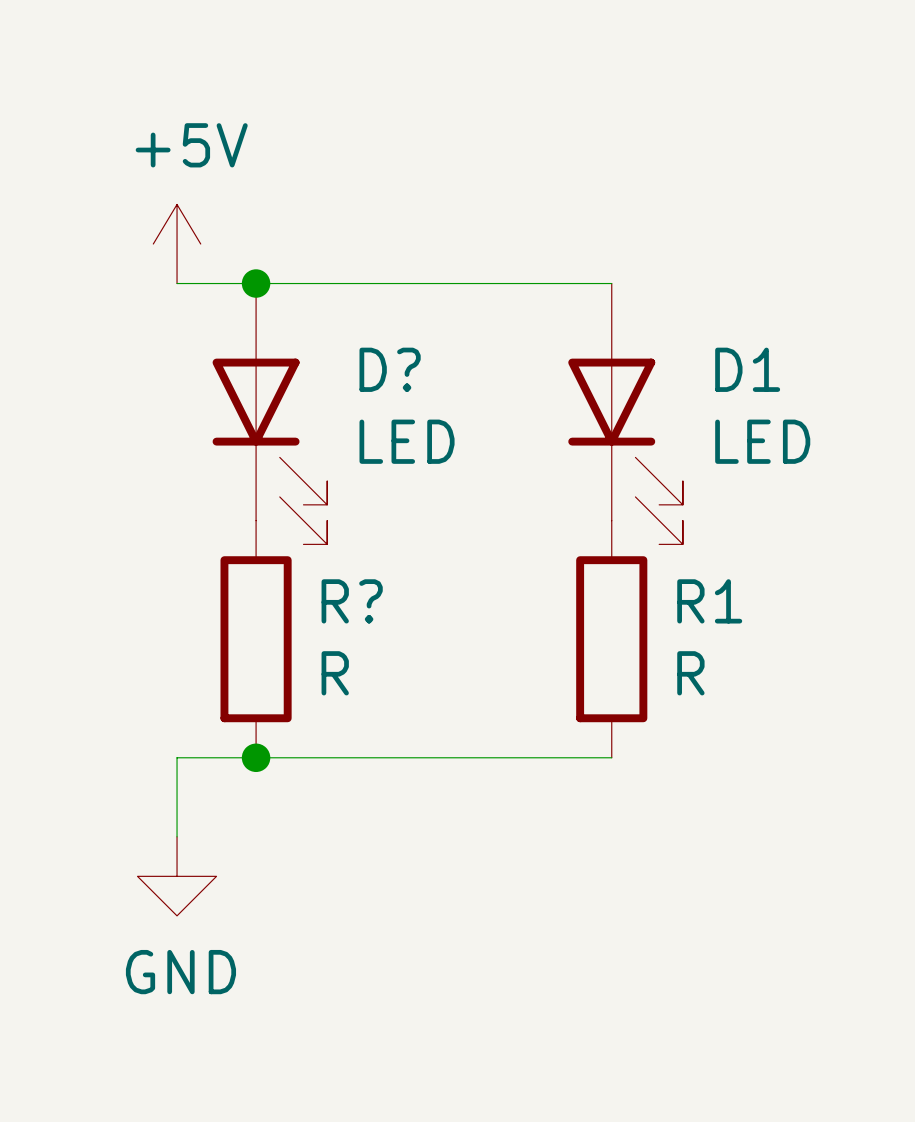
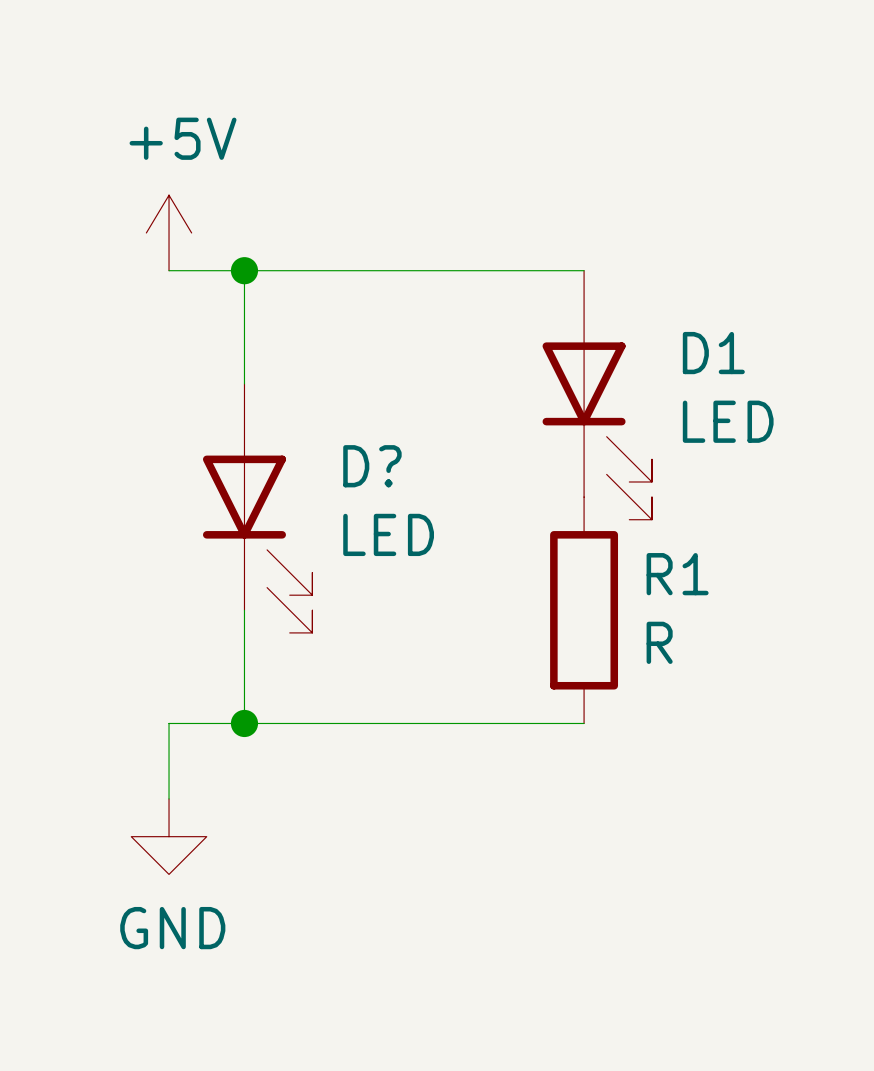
D? position: (269, 413) -> (257, 508)
wire: none -> (244, 610) (244, 723)
R?: R (256, 639) -> none

